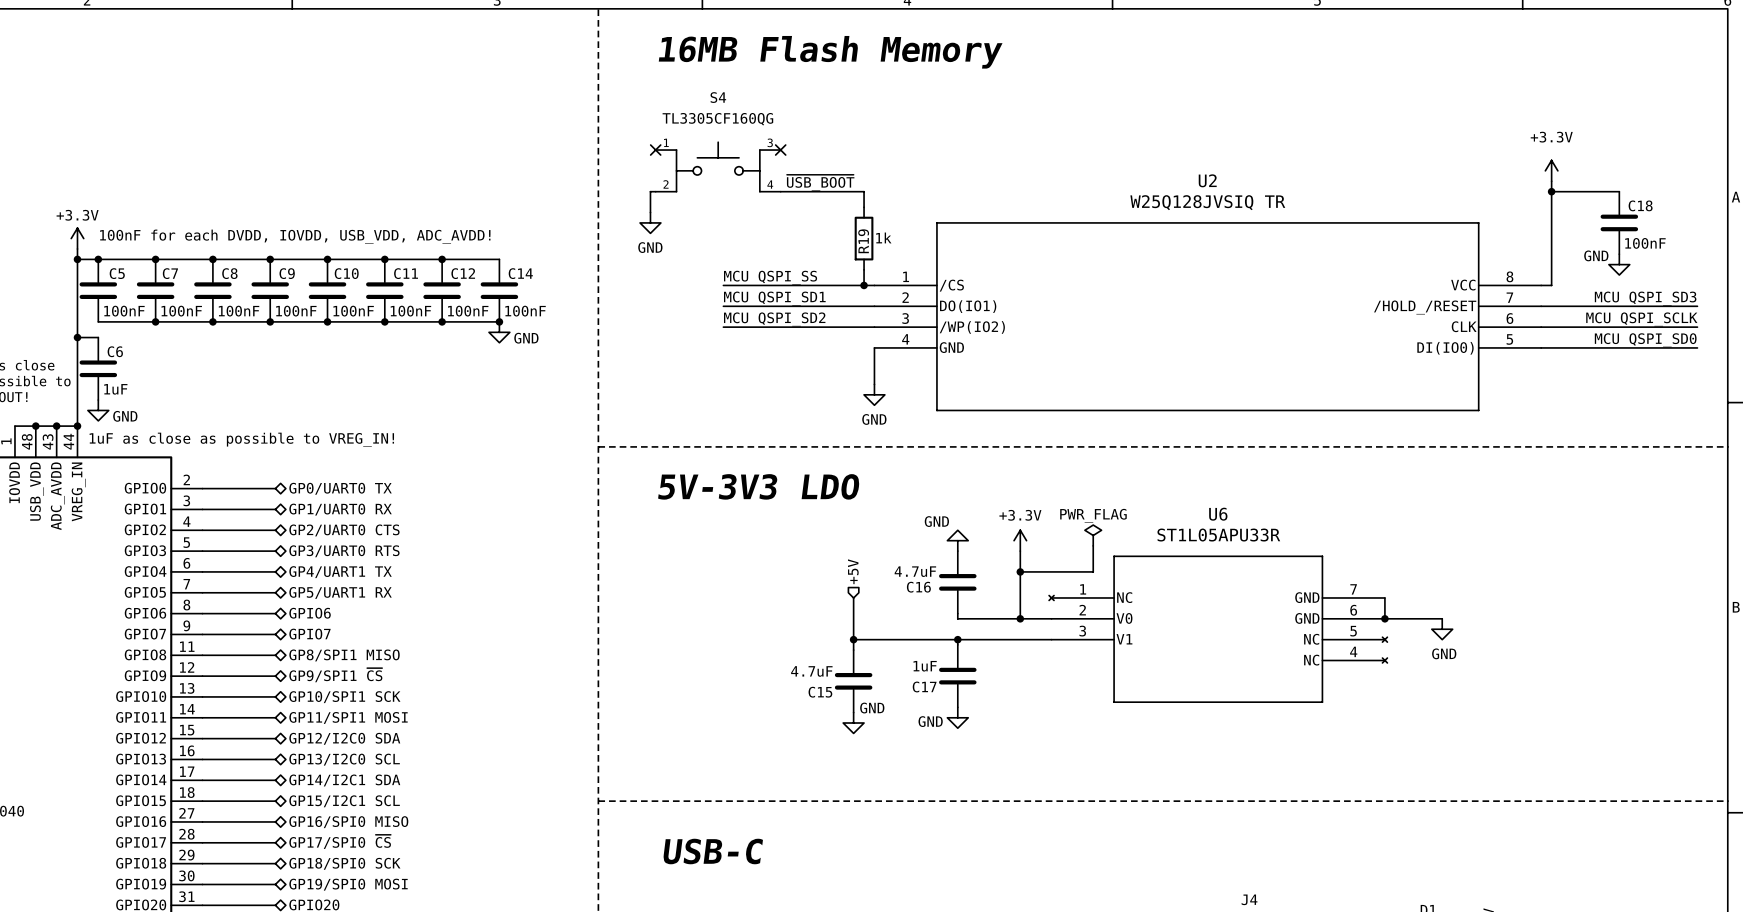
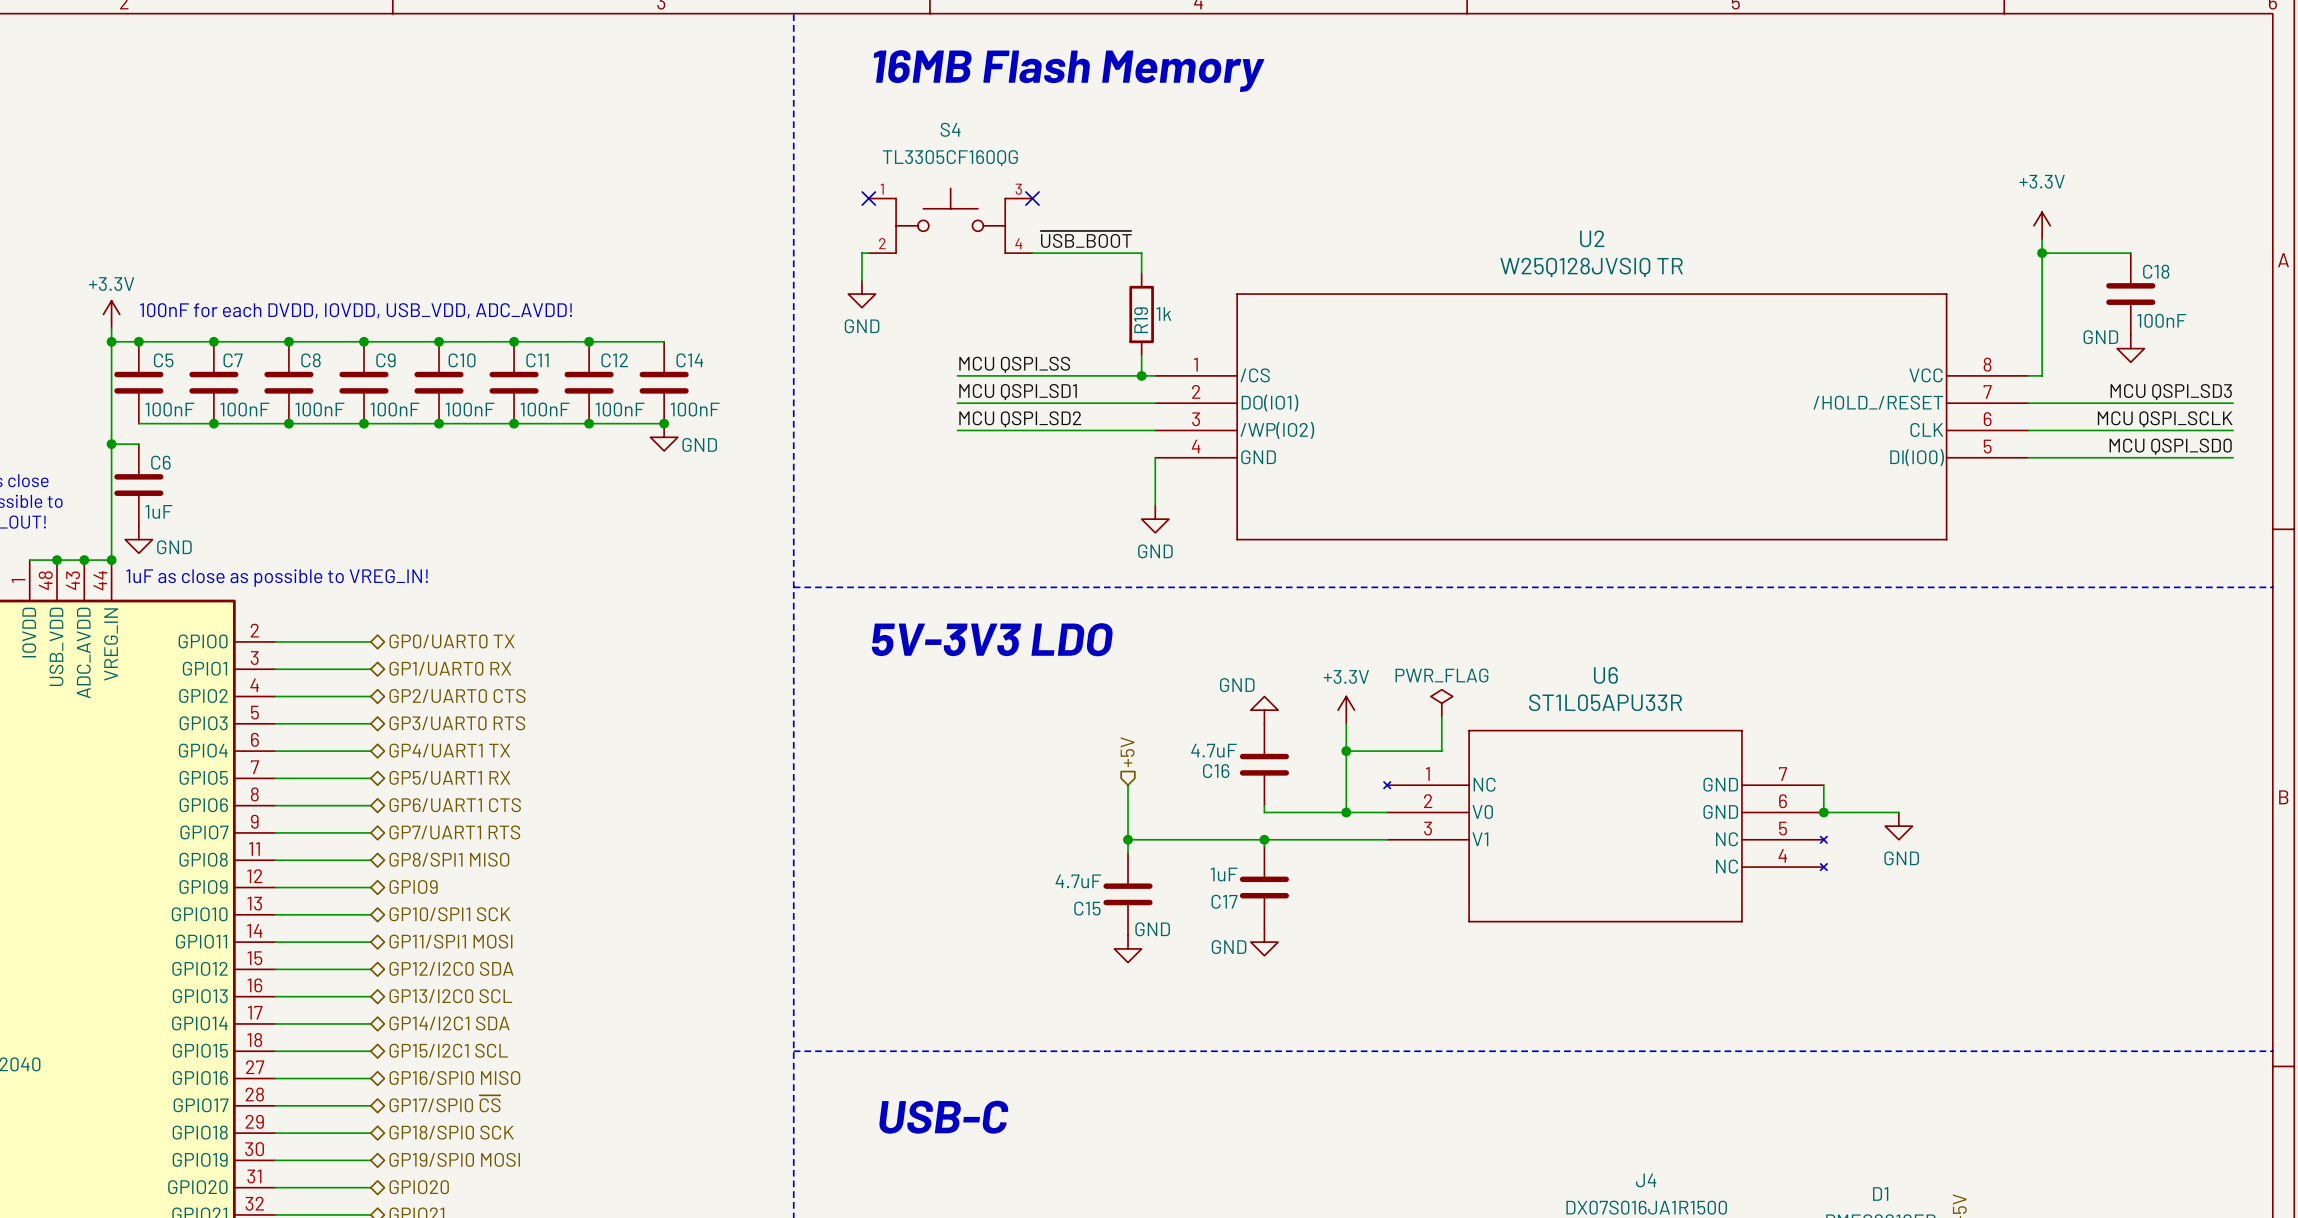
hierarchical label: GPIO6 (310, 613) -> GP6/UART1 CTS (455, 805)
hierarchical label: GPIO7 (309, 634) -> GP7/UART1 RTS (454, 832)
hierarchical label: GP9/SPI1 ~{CS} (335, 675) -> GPIO9 (413, 887)

